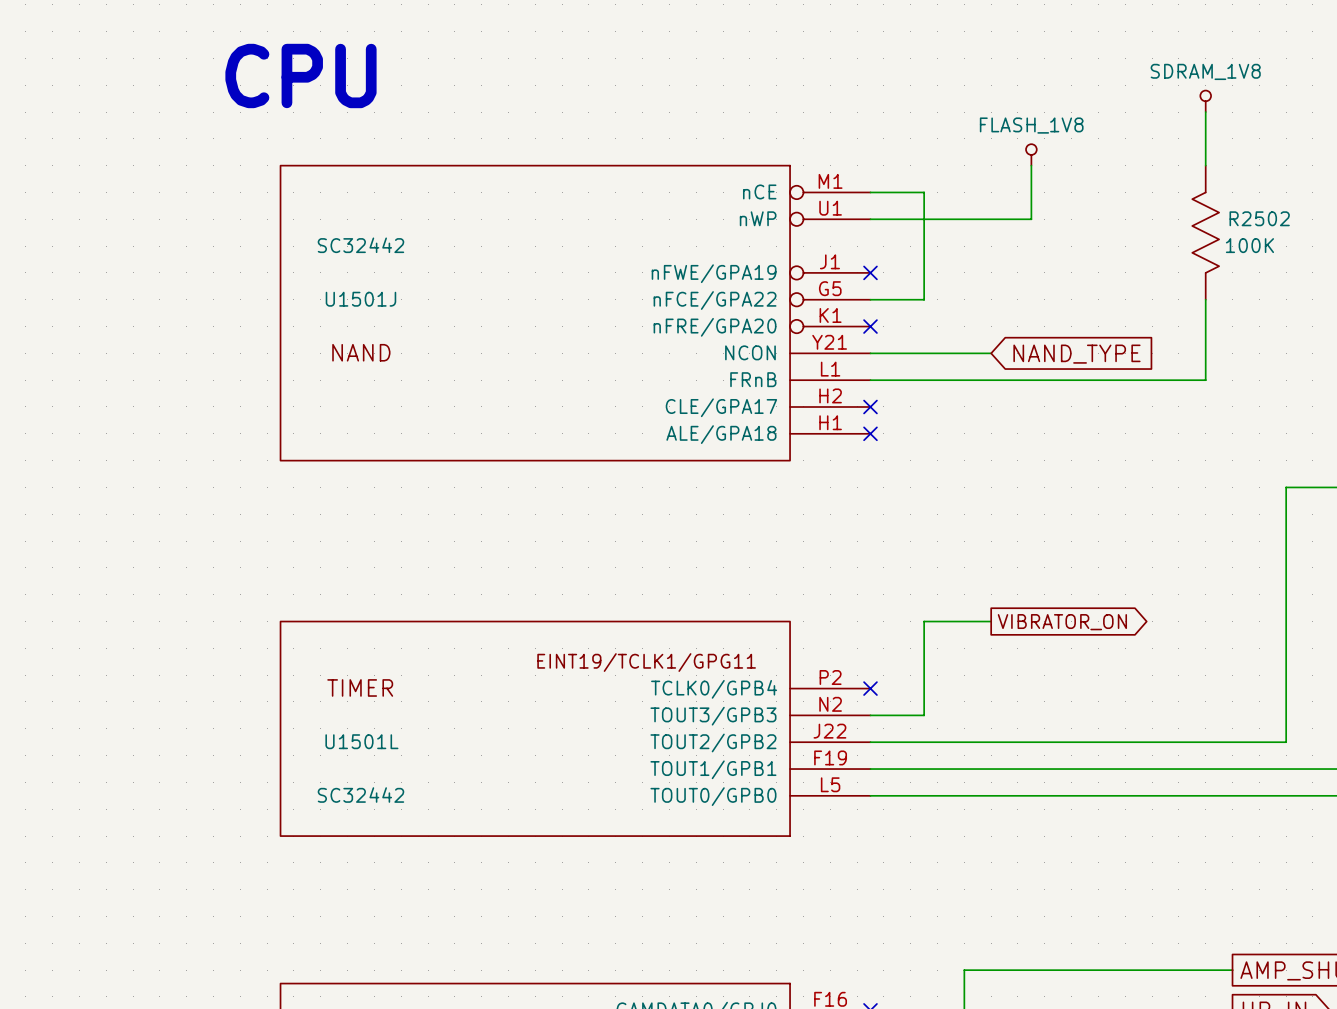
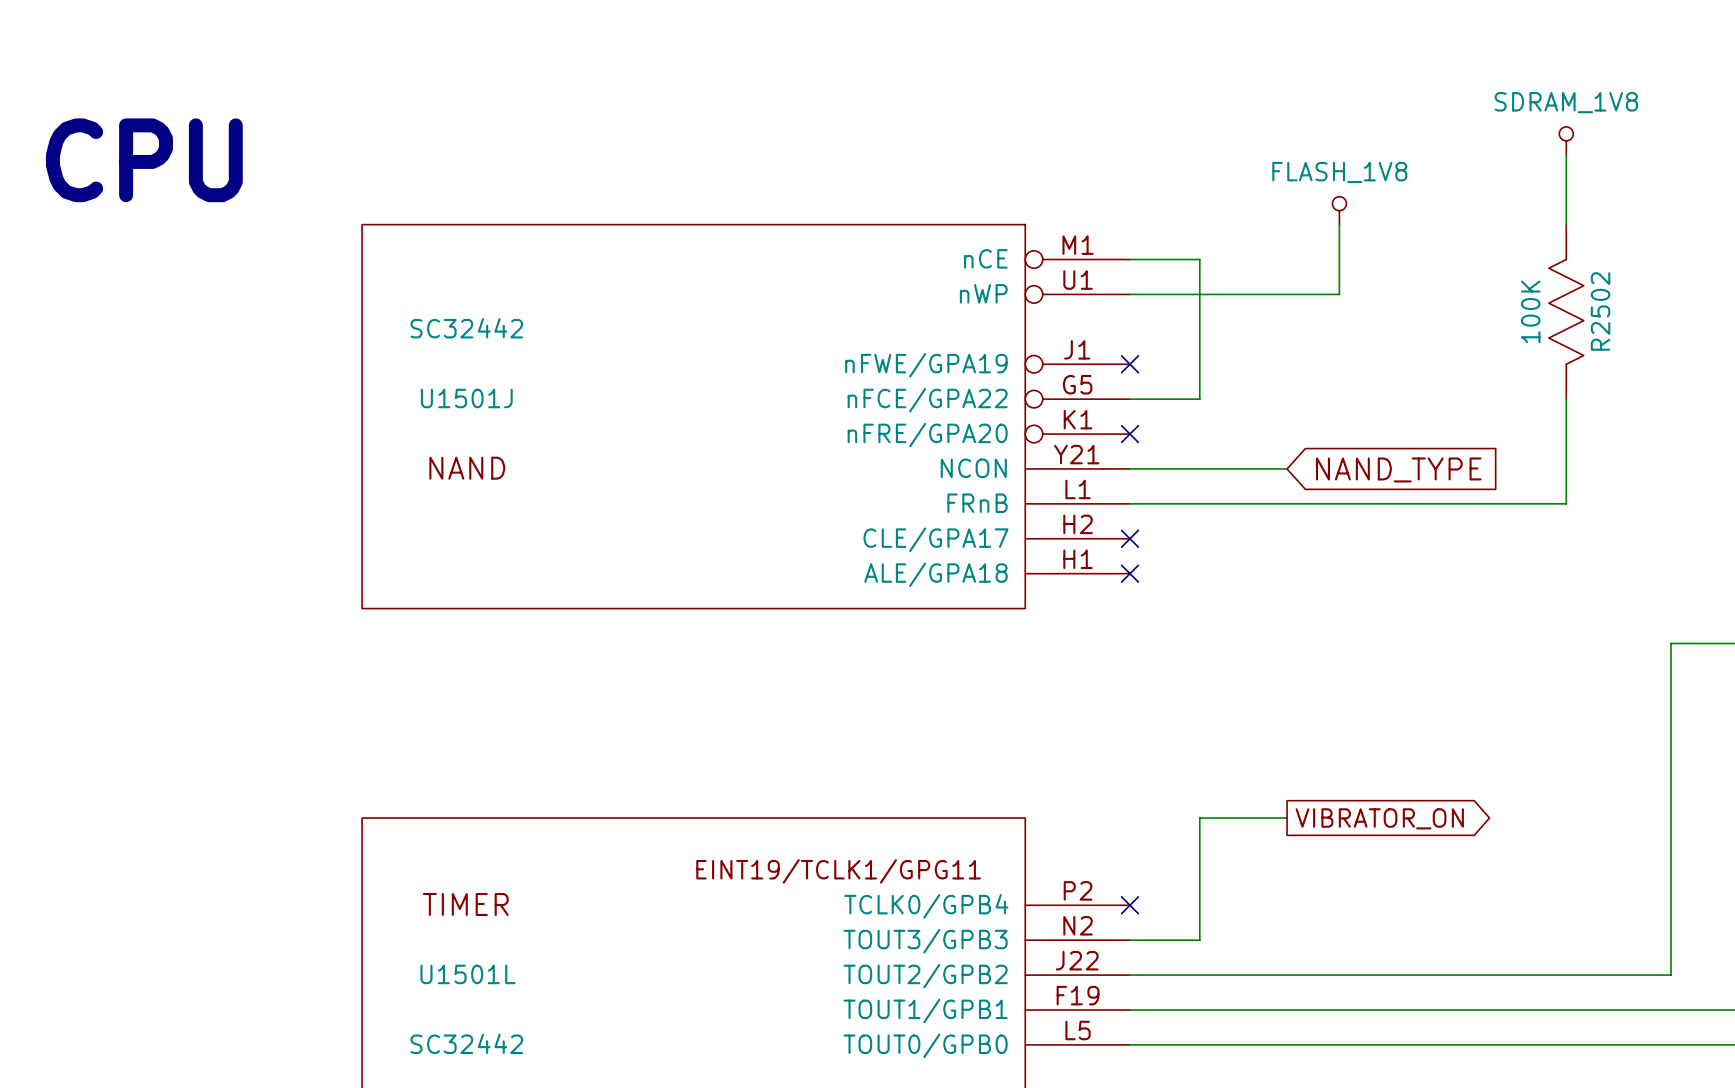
text position: CPU (300, 75) -> CPU (144, 160)
R2502 name rotation: 0° (1259, 218) -> 90° counterclockwise (1600, 311)
R2502 value rotation: 0° (1249, 245) -> 90° counterclockwise (1530, 311)
R2502 value position: 100K (1249, 245) -> 100K (1530, 311)

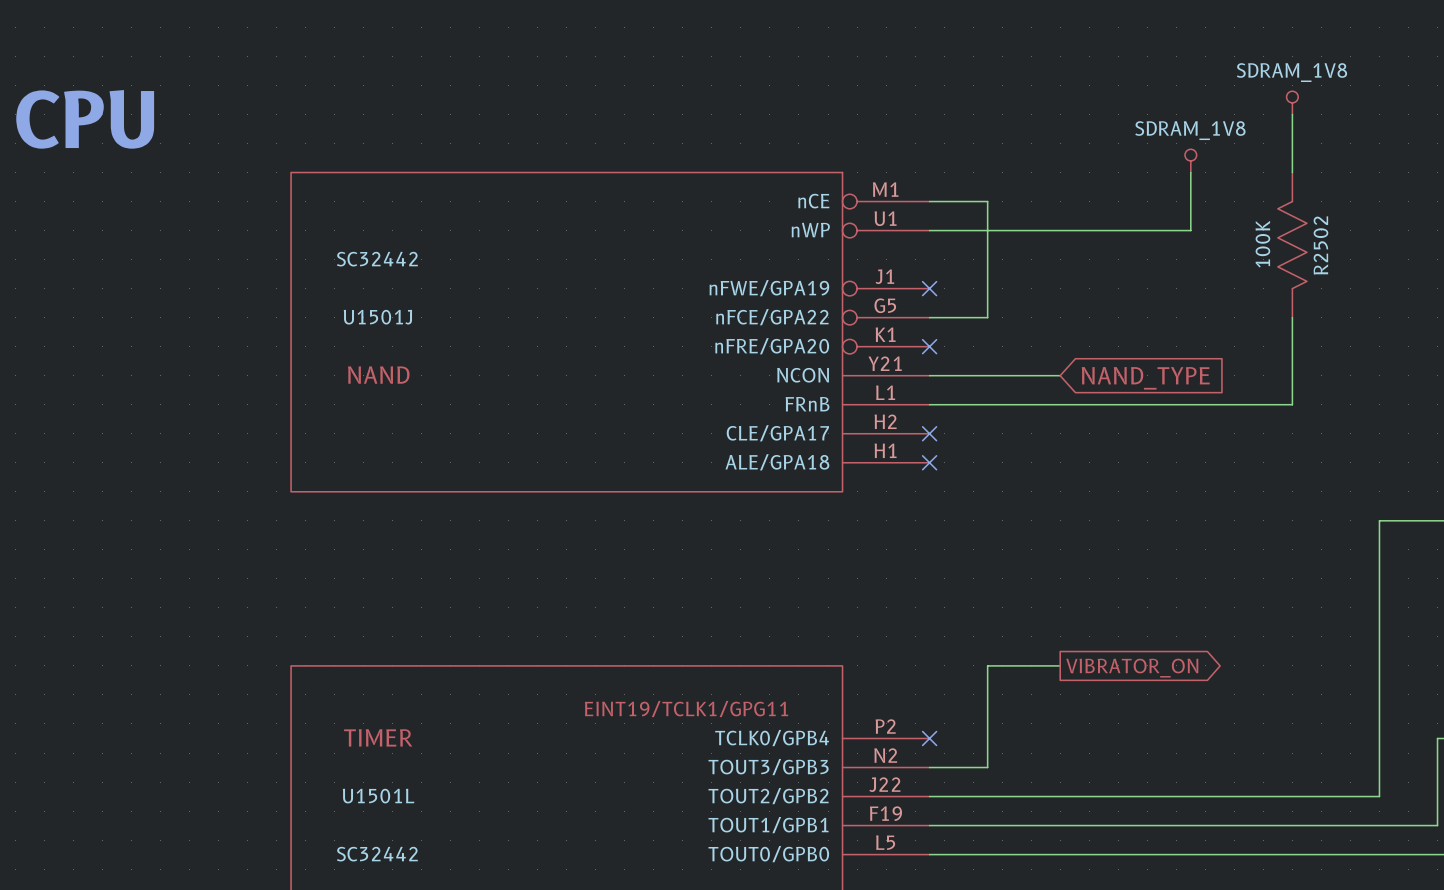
power symbol: FLASH_1V8 (1339, 210) -> none
power symbol: none -> SDRAM_1V8 (1190, 160)
wire: (1339, 224) (1339, 294) -> (1190, 172) (1190, 230) (1103, 230)

